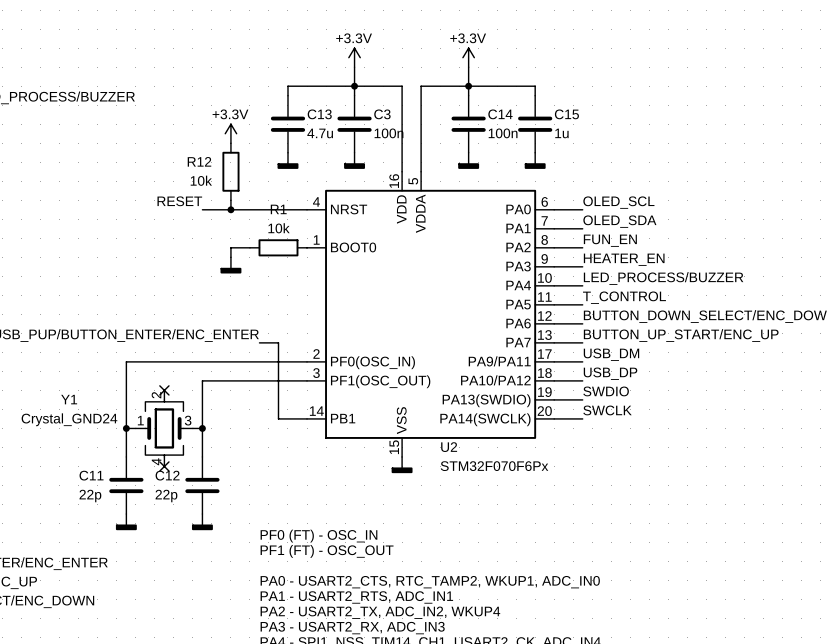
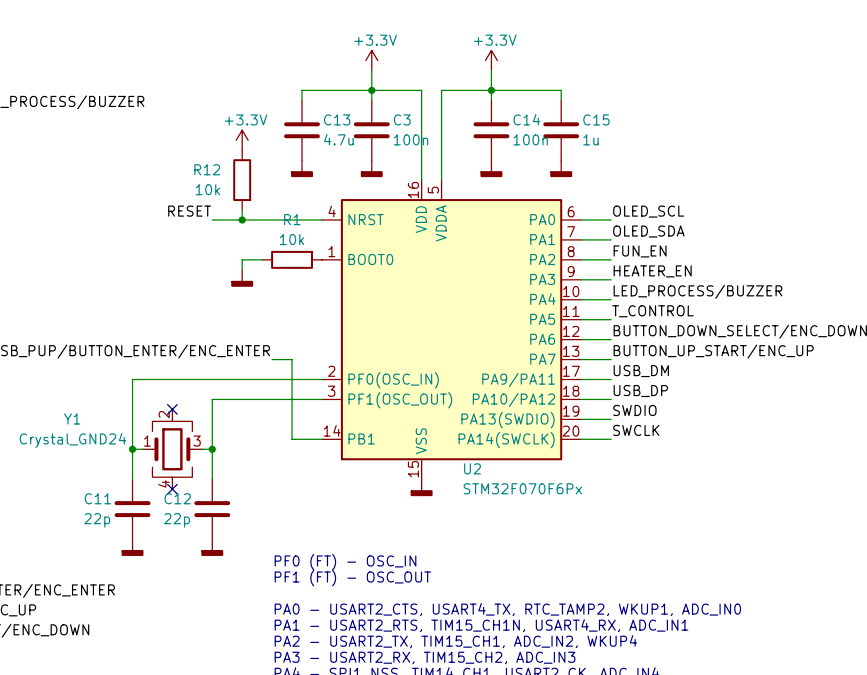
text: PA0 - USART2_CTS, RTC_TAMP2, WKUP1, ADC_IN0 (430, 582) -> PA0 - USART2_CTS, USART4_TX, RTC_TAMP2, WKUP1, ADC_IN0 (507, 609)
text: PA1 - USART2_RTS, ADC_IN1 (356, 597) -> PA1 - USART2_RTS, TIM15_CH1N, USART4_RX, ADC_IN1 (481, 625)
text: PA2 - USART2_TX, ADC_IN2, WKUP4 (380, 612) -> PA2 - USART2_TX, TIM15_CH1, ADC_IN2, WKUP4 (455, 641)
text: PA3 - USART2_RX, ADC_IN3 (352, 628) -> PA3 - USART2_RX, TIM15_CH2, ADC_IN3 (425, 657)

